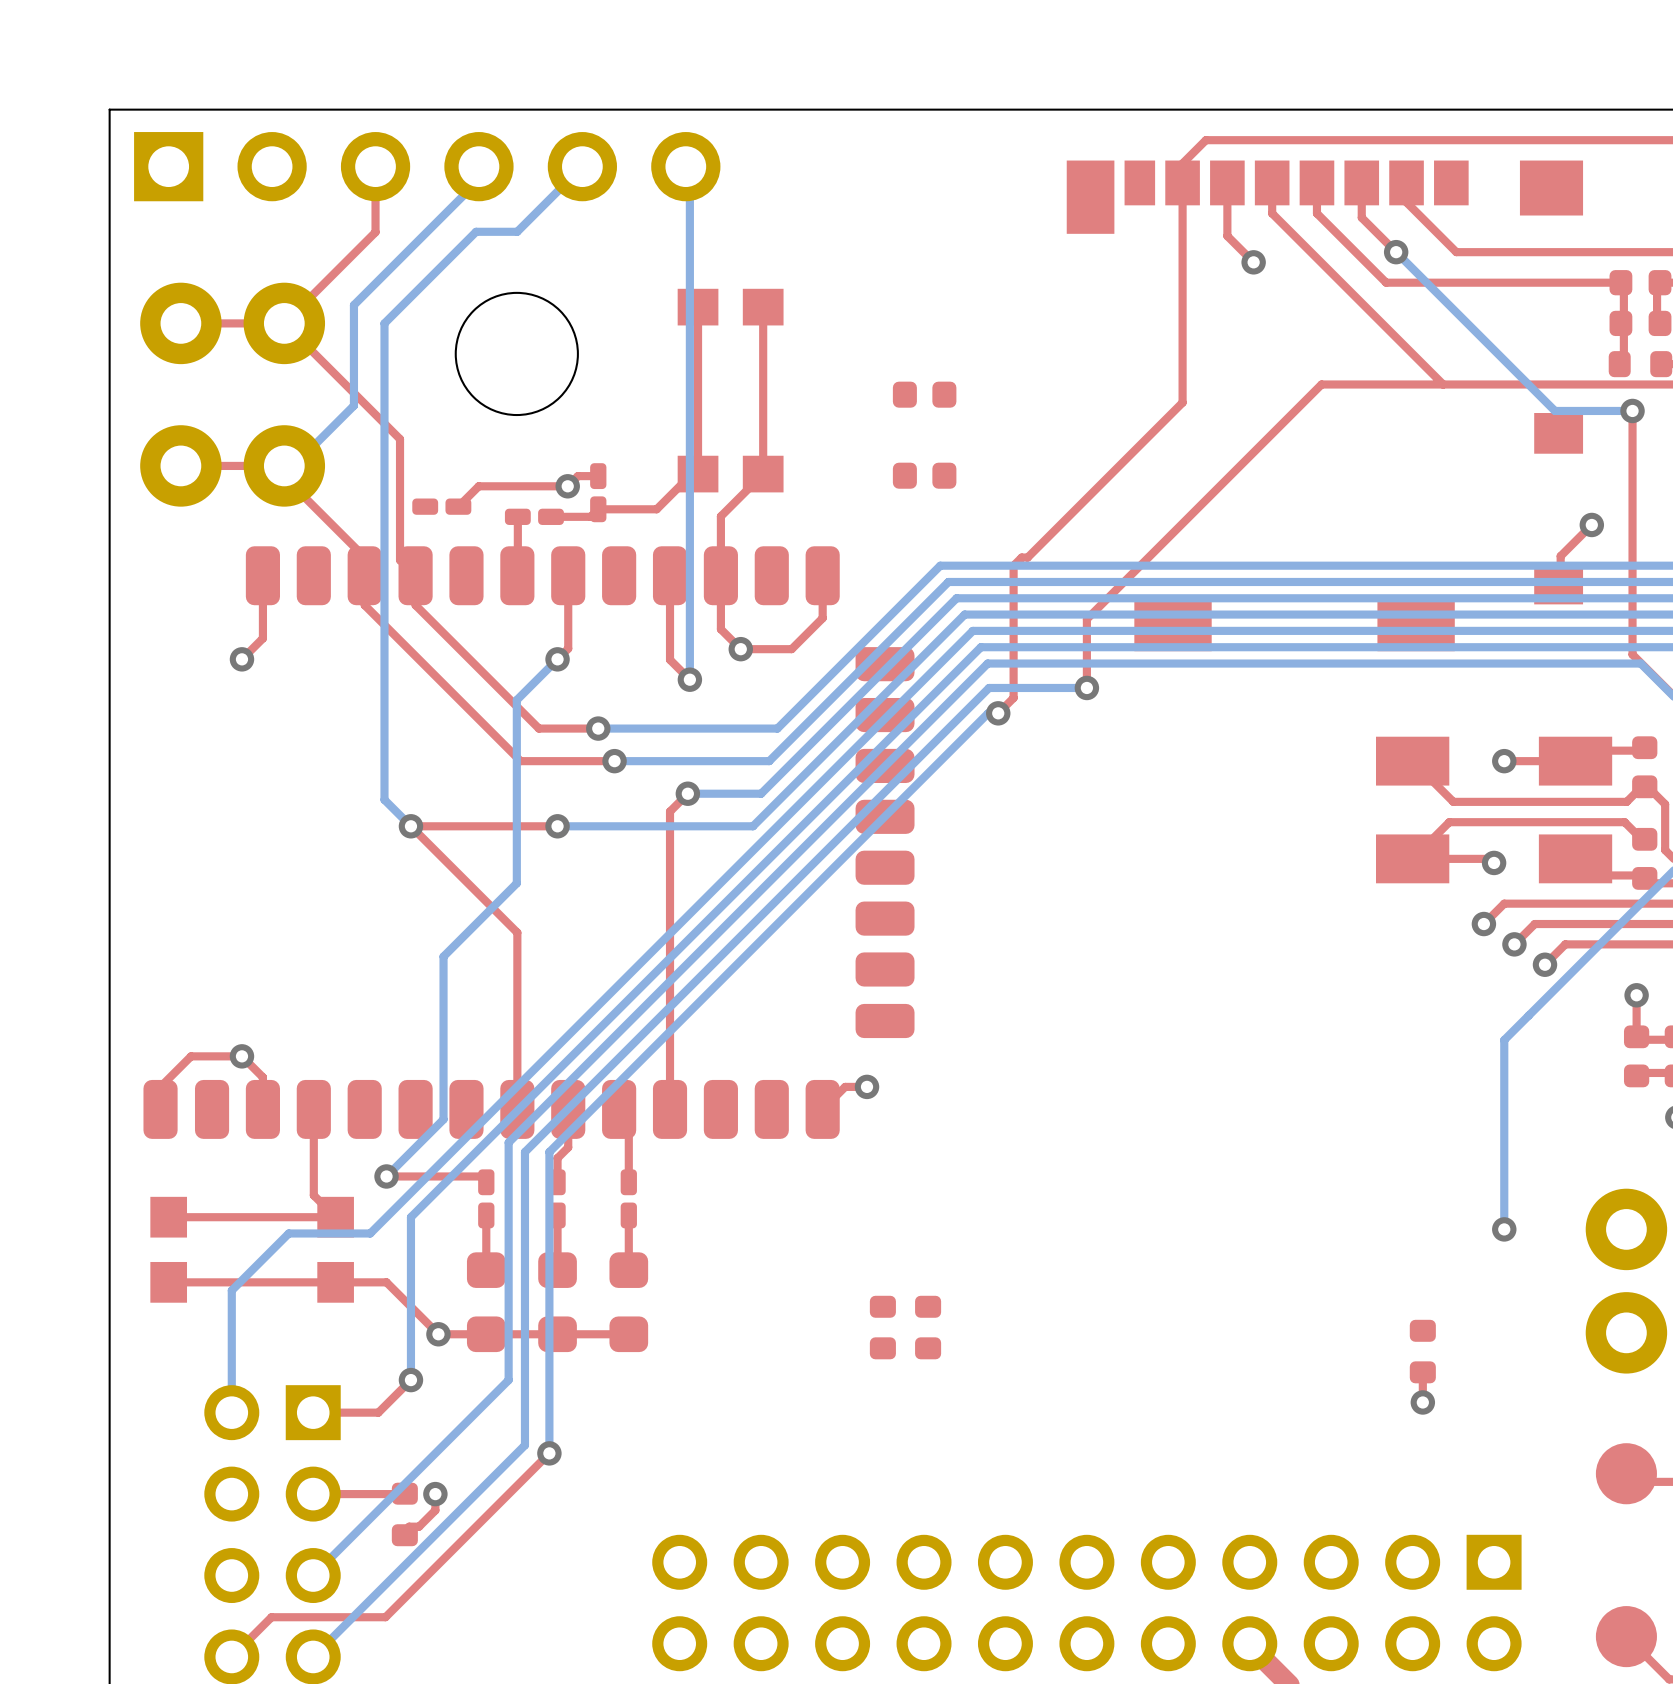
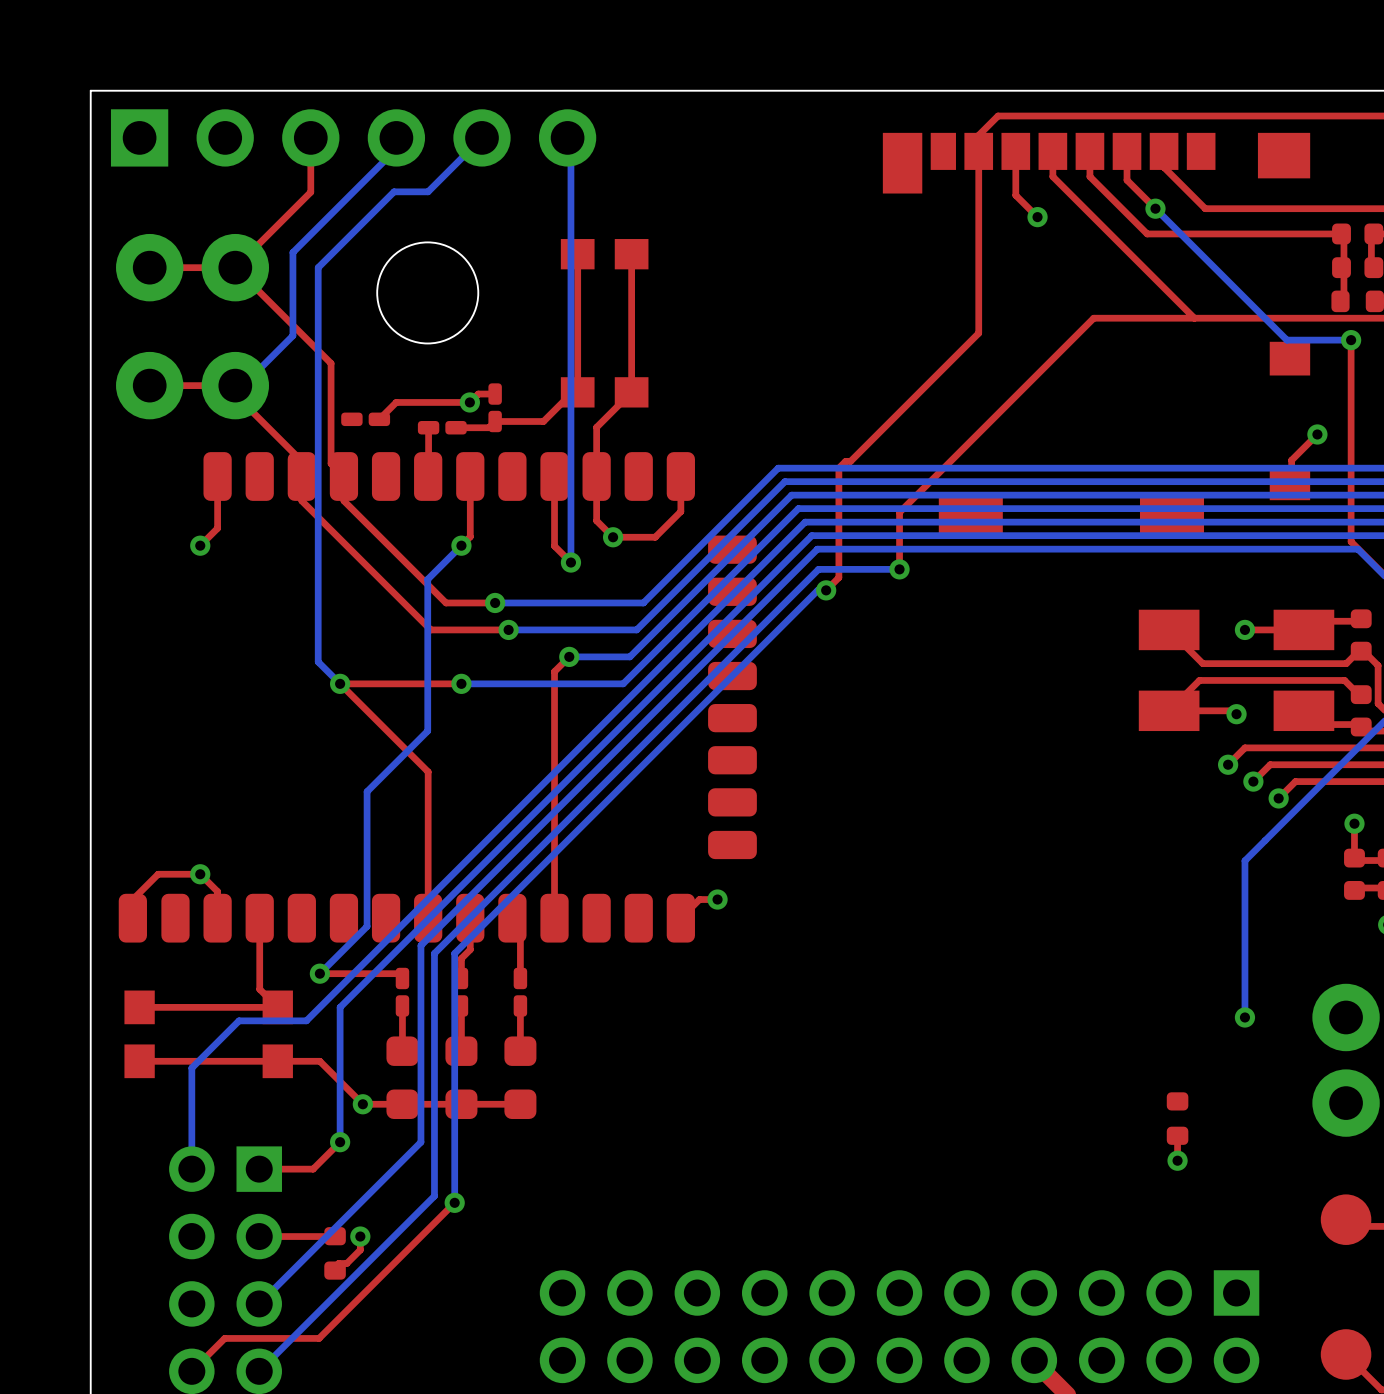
part: (924, 394) -> none
part: (924, 475) -> none
part: (882, 1327) -> none
part: (928, 1327) -> none

